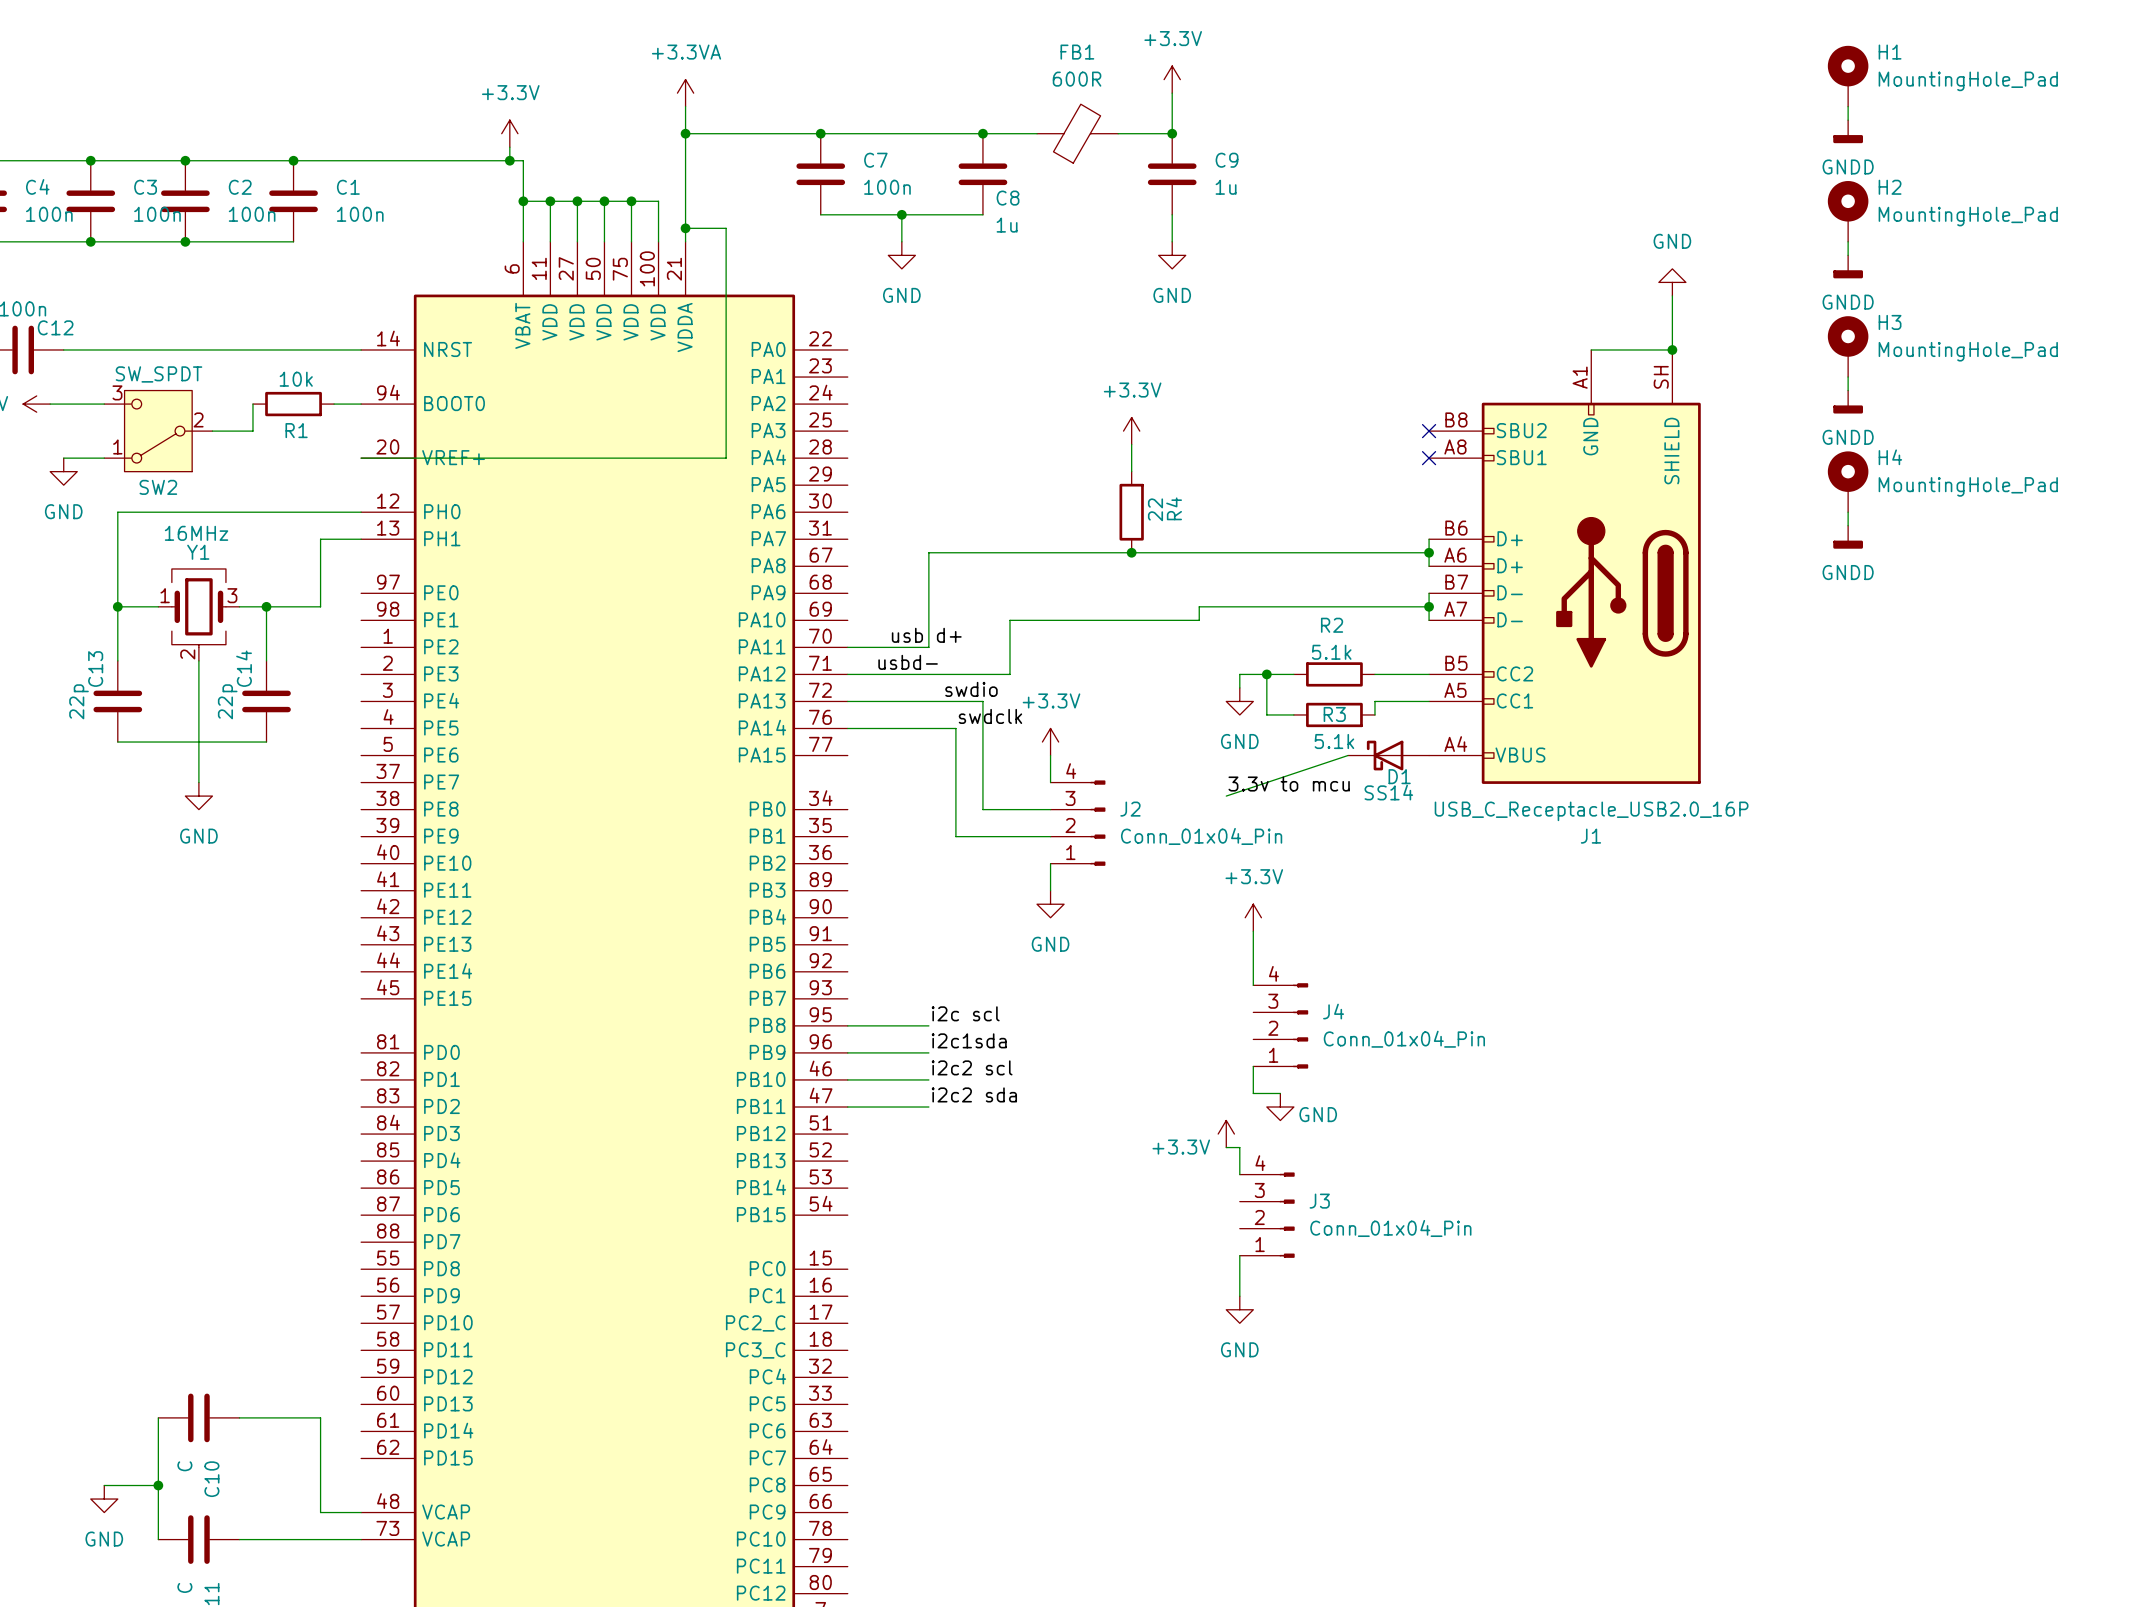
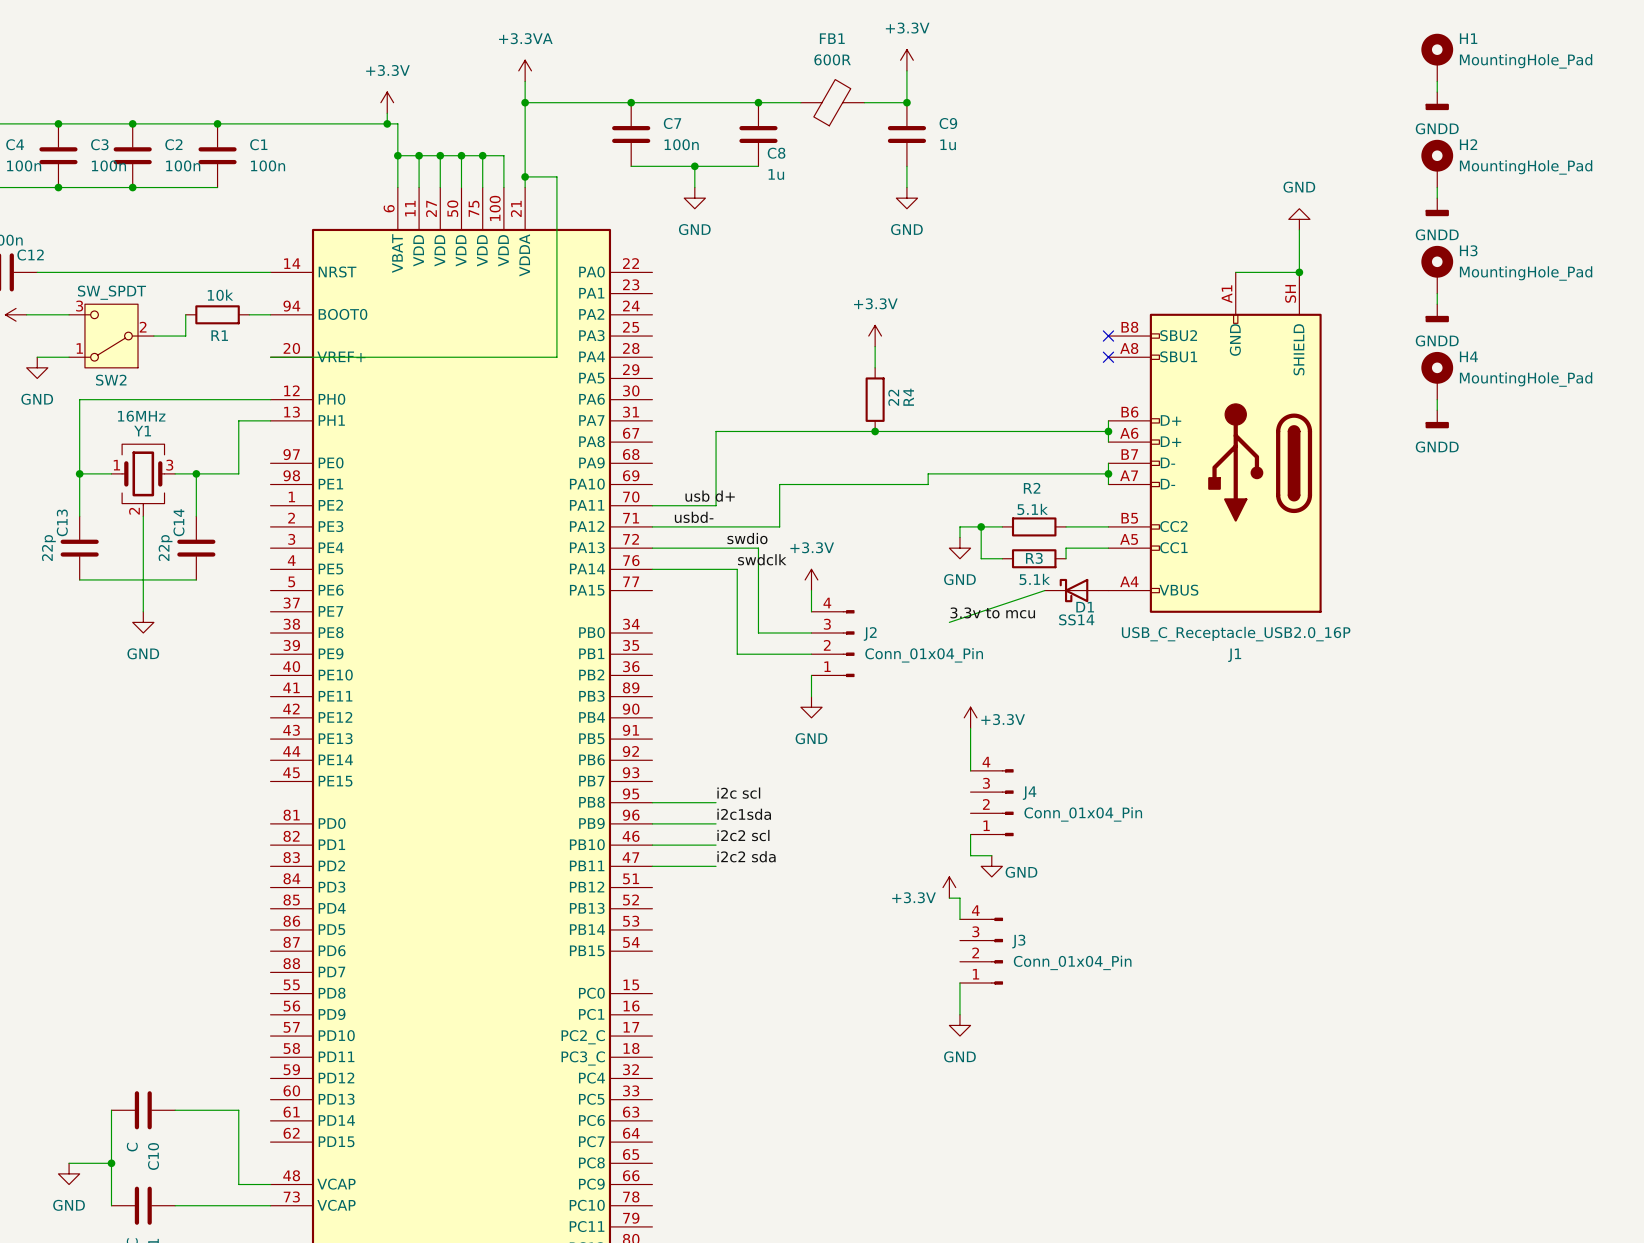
power symbol text position: +3.3V (1254, 876) -> +3.3V (1003, 719)

